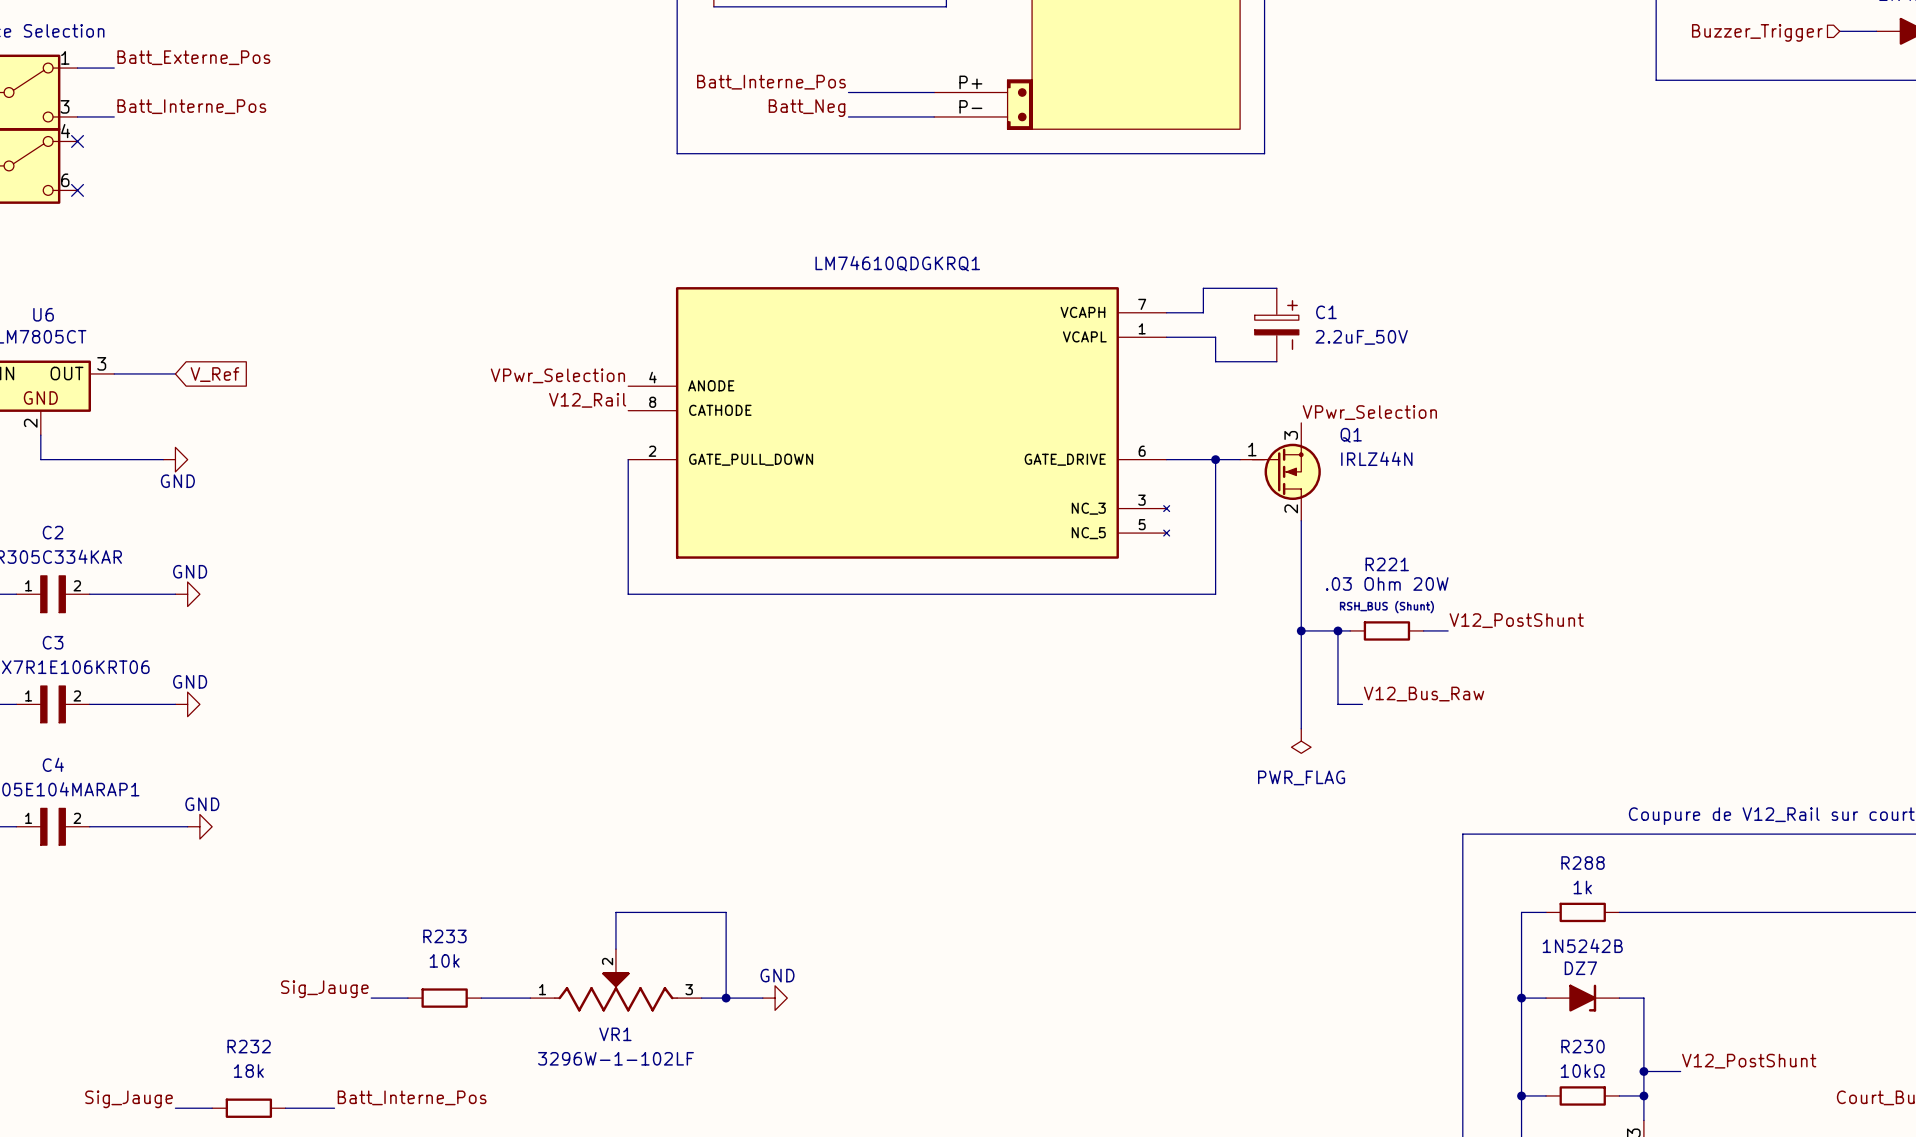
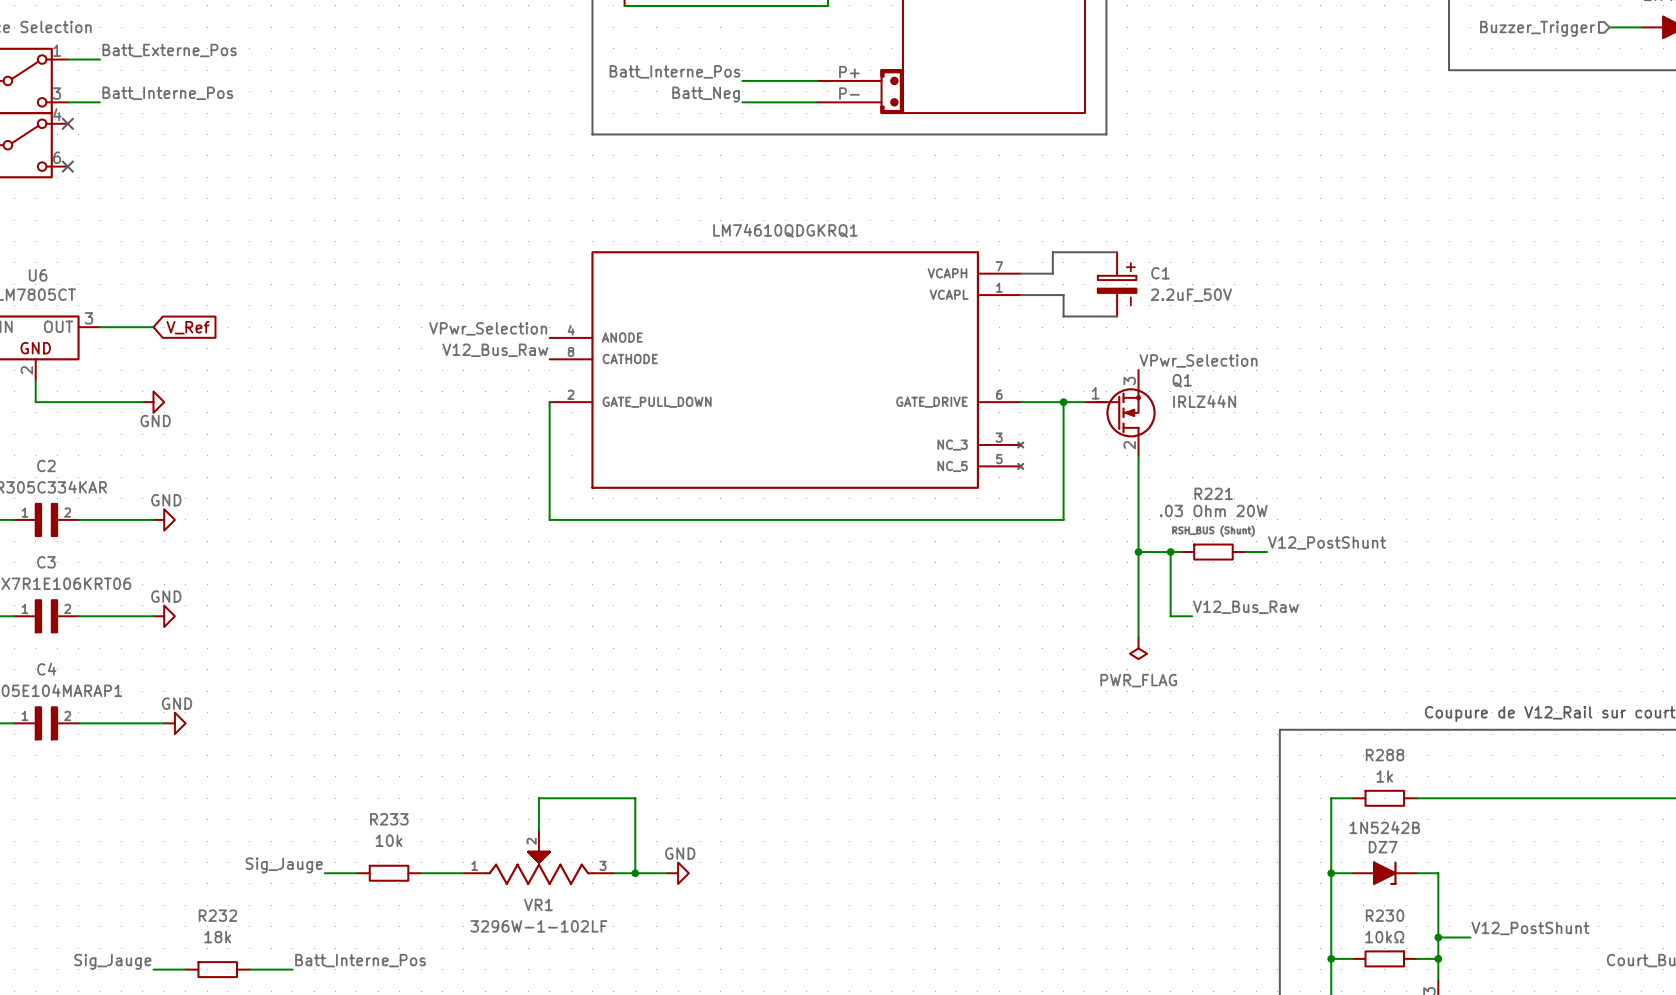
label: V12_Rail (587, 400) -> V12_Bus_Raw (495, 350)

